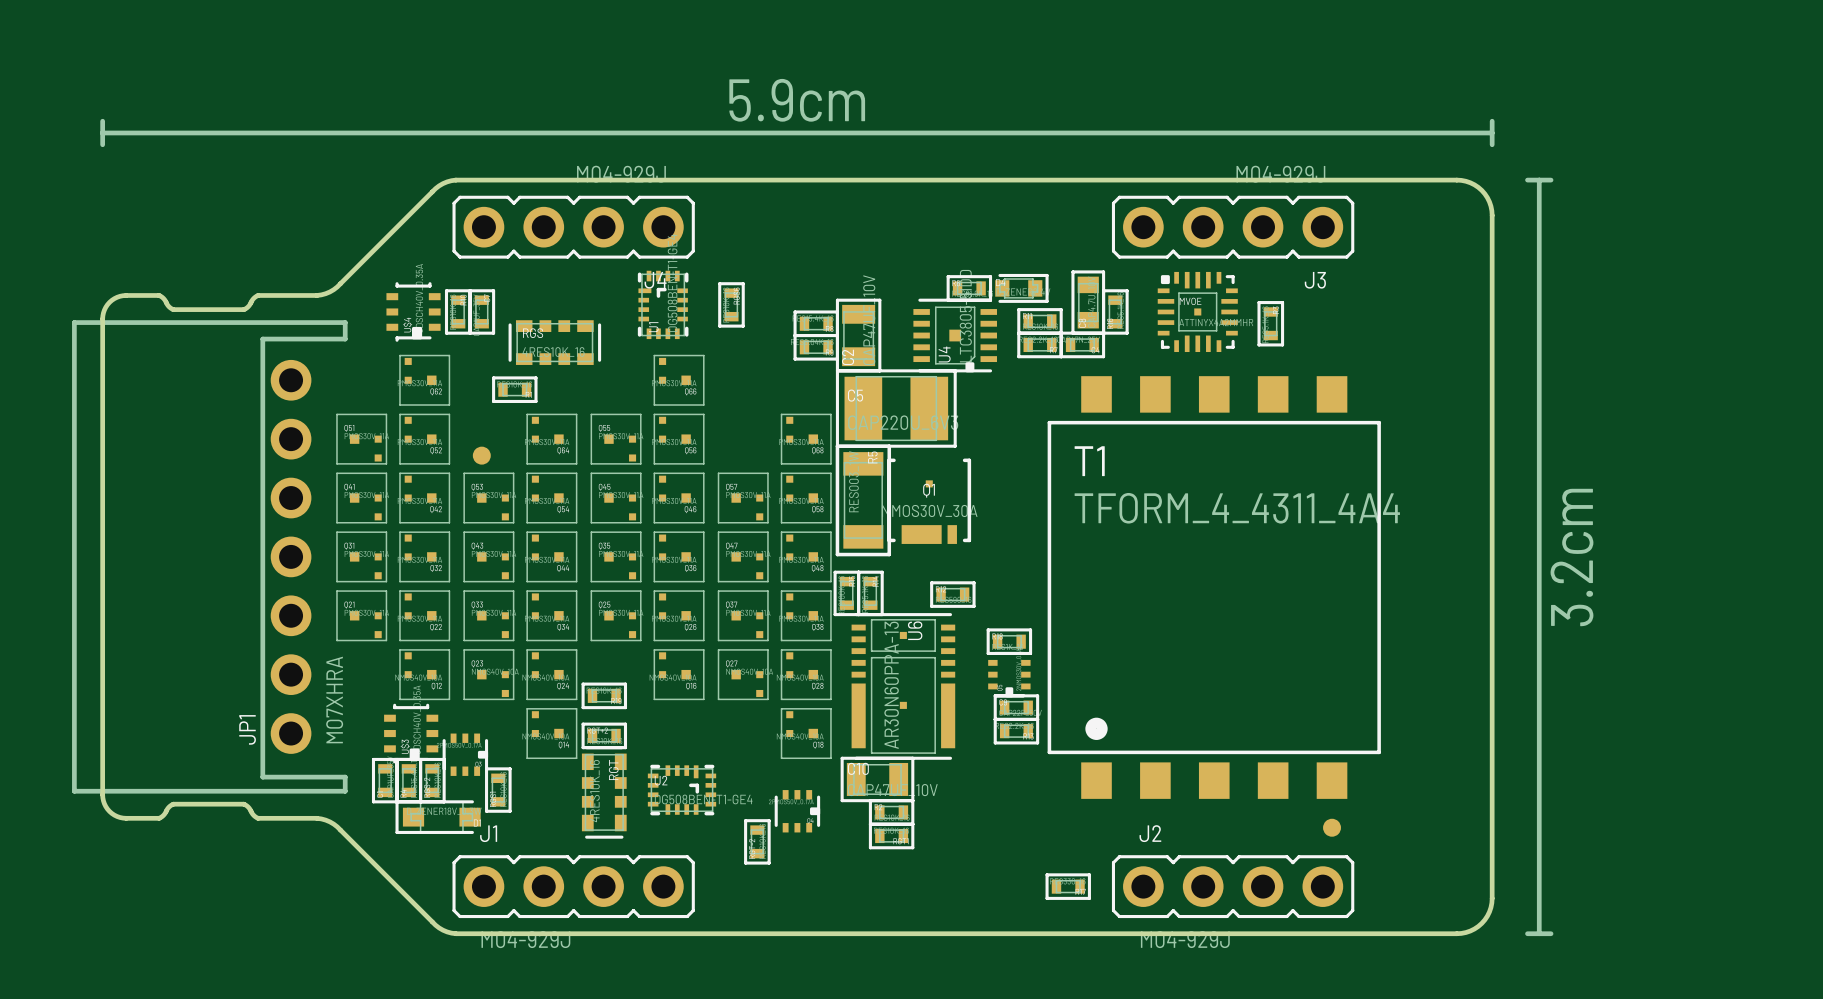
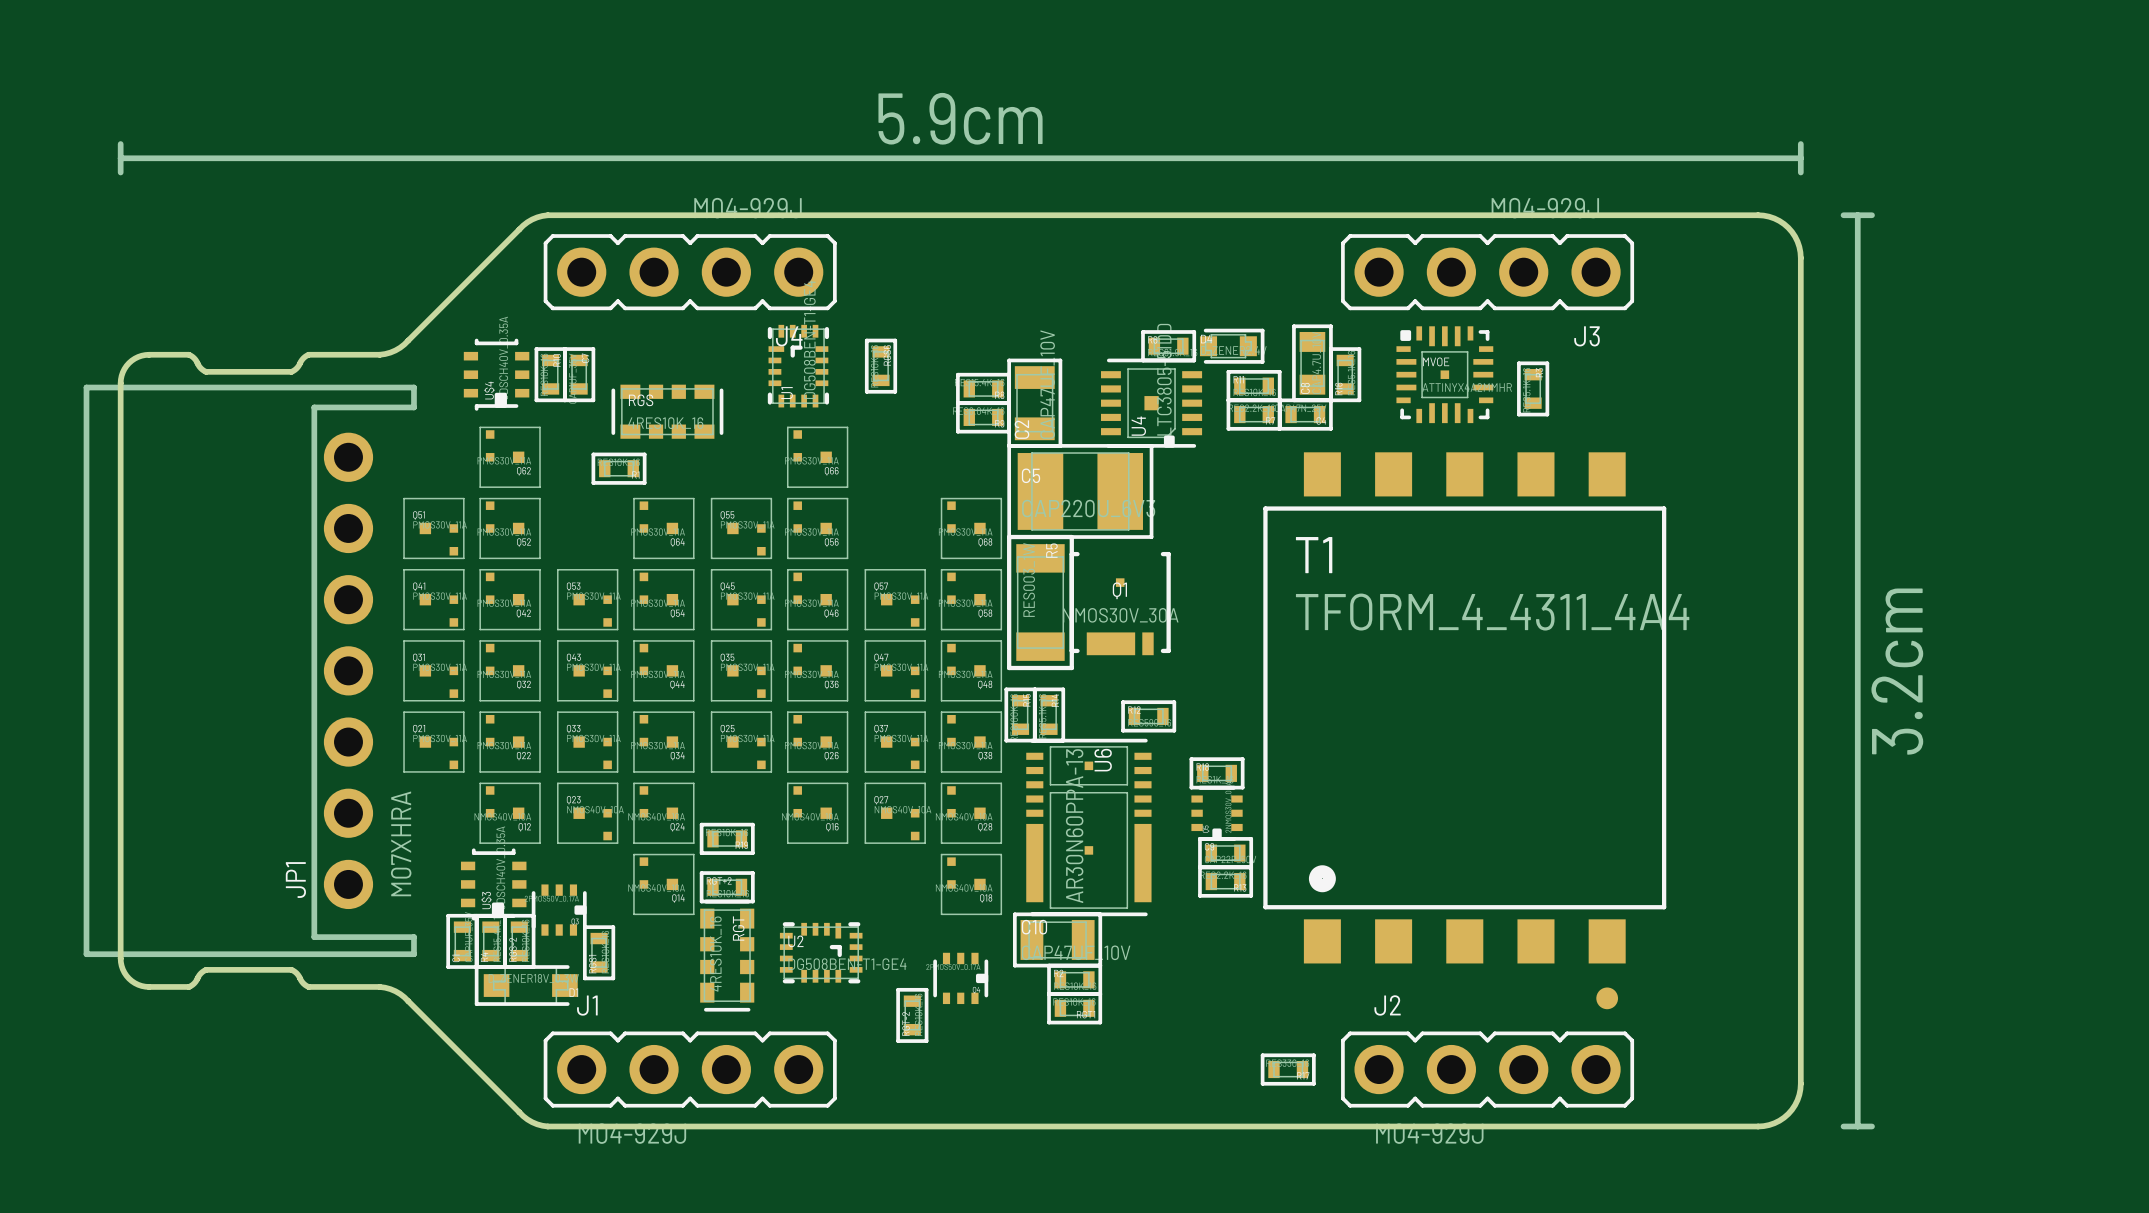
part: (481, 455) -> none

